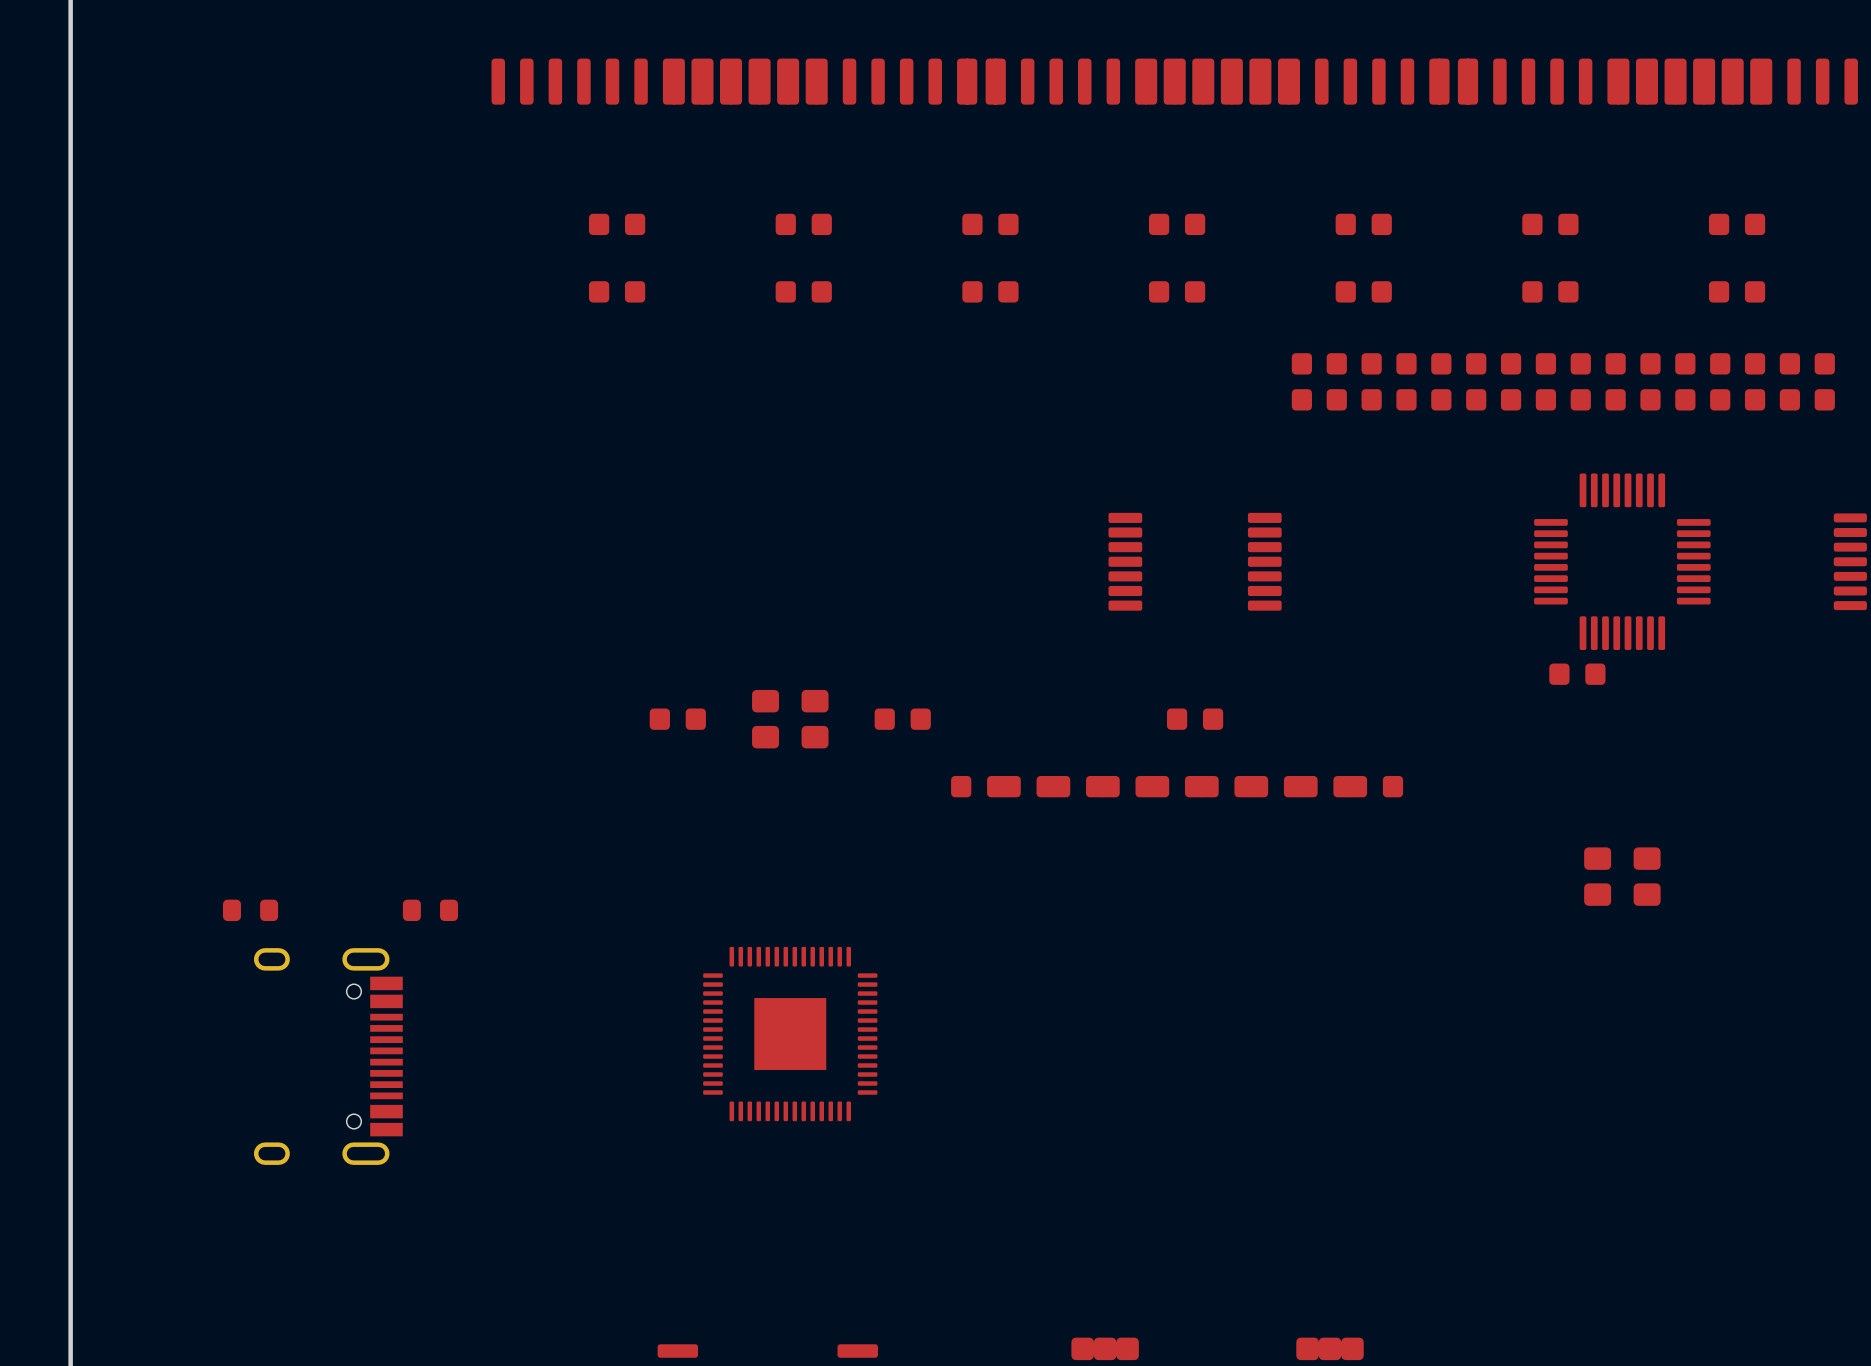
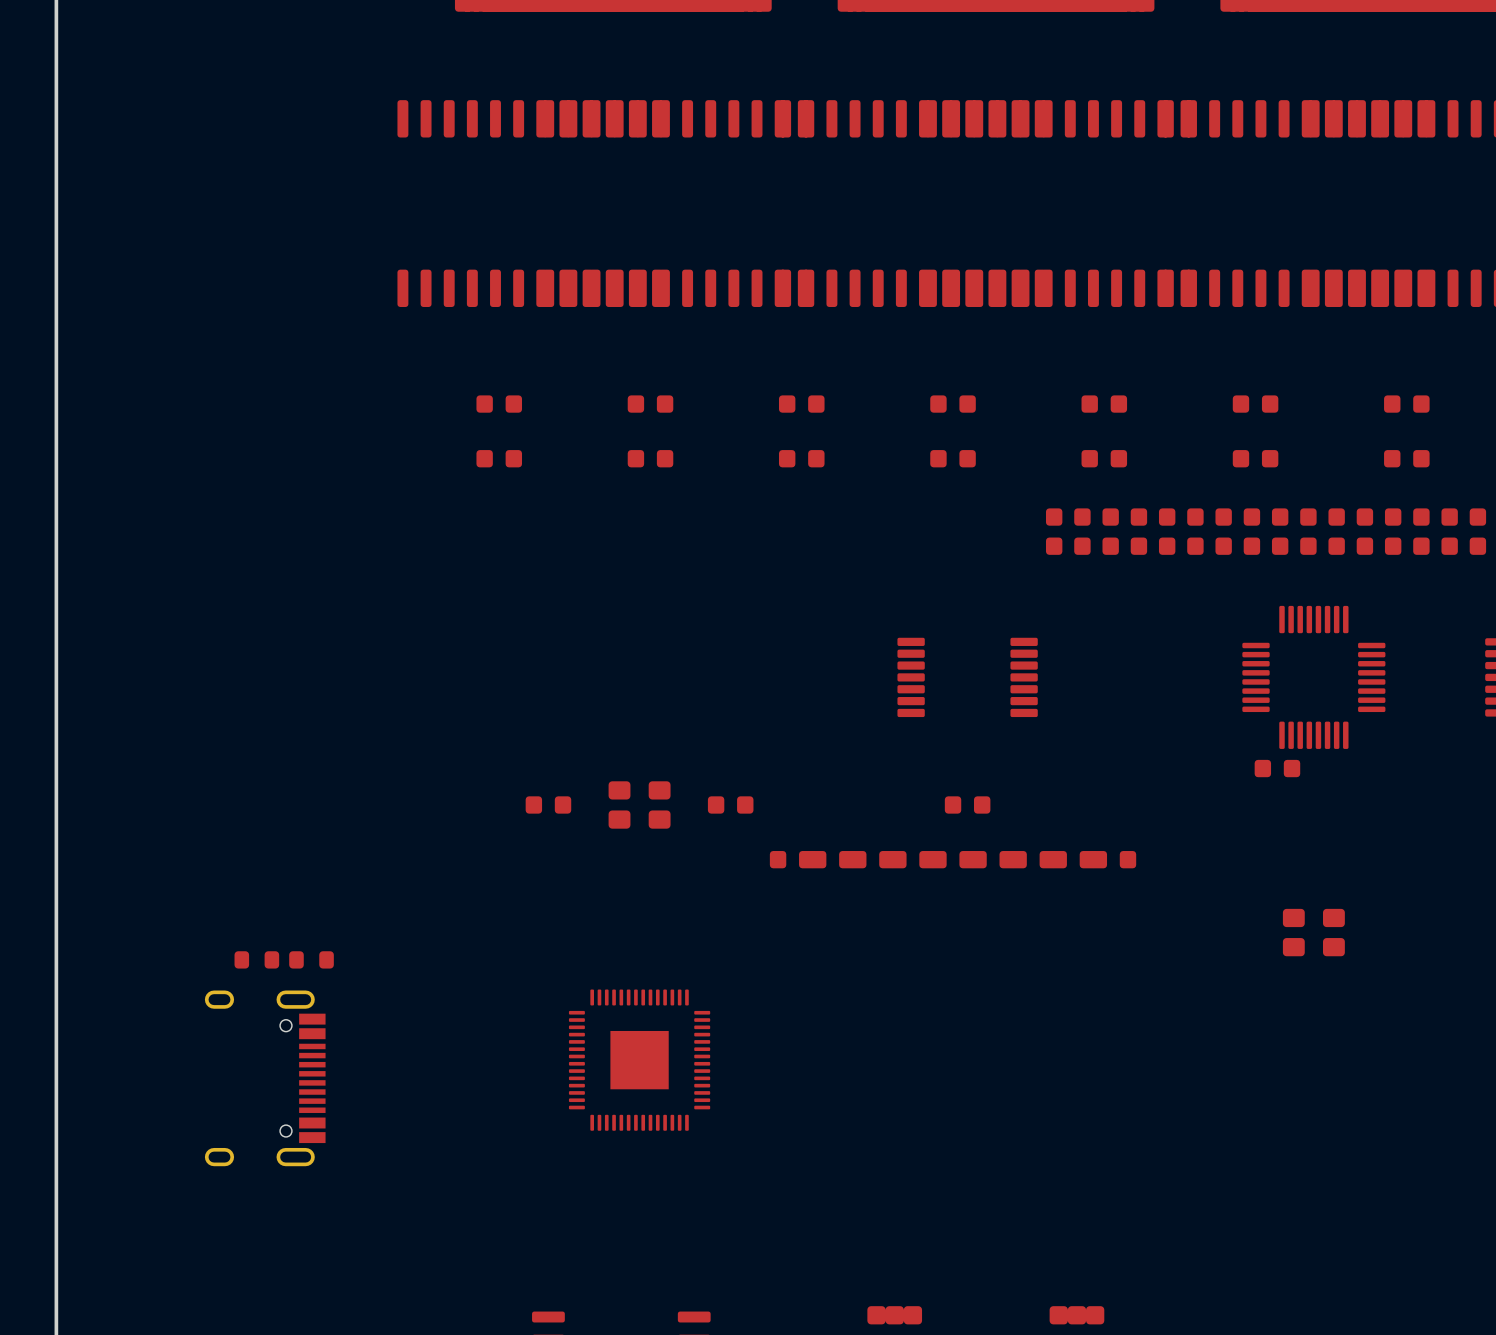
part: (250, 910) -> none
part: none -> (256, 959)
part position: (430, 910) -> (311, 959)

